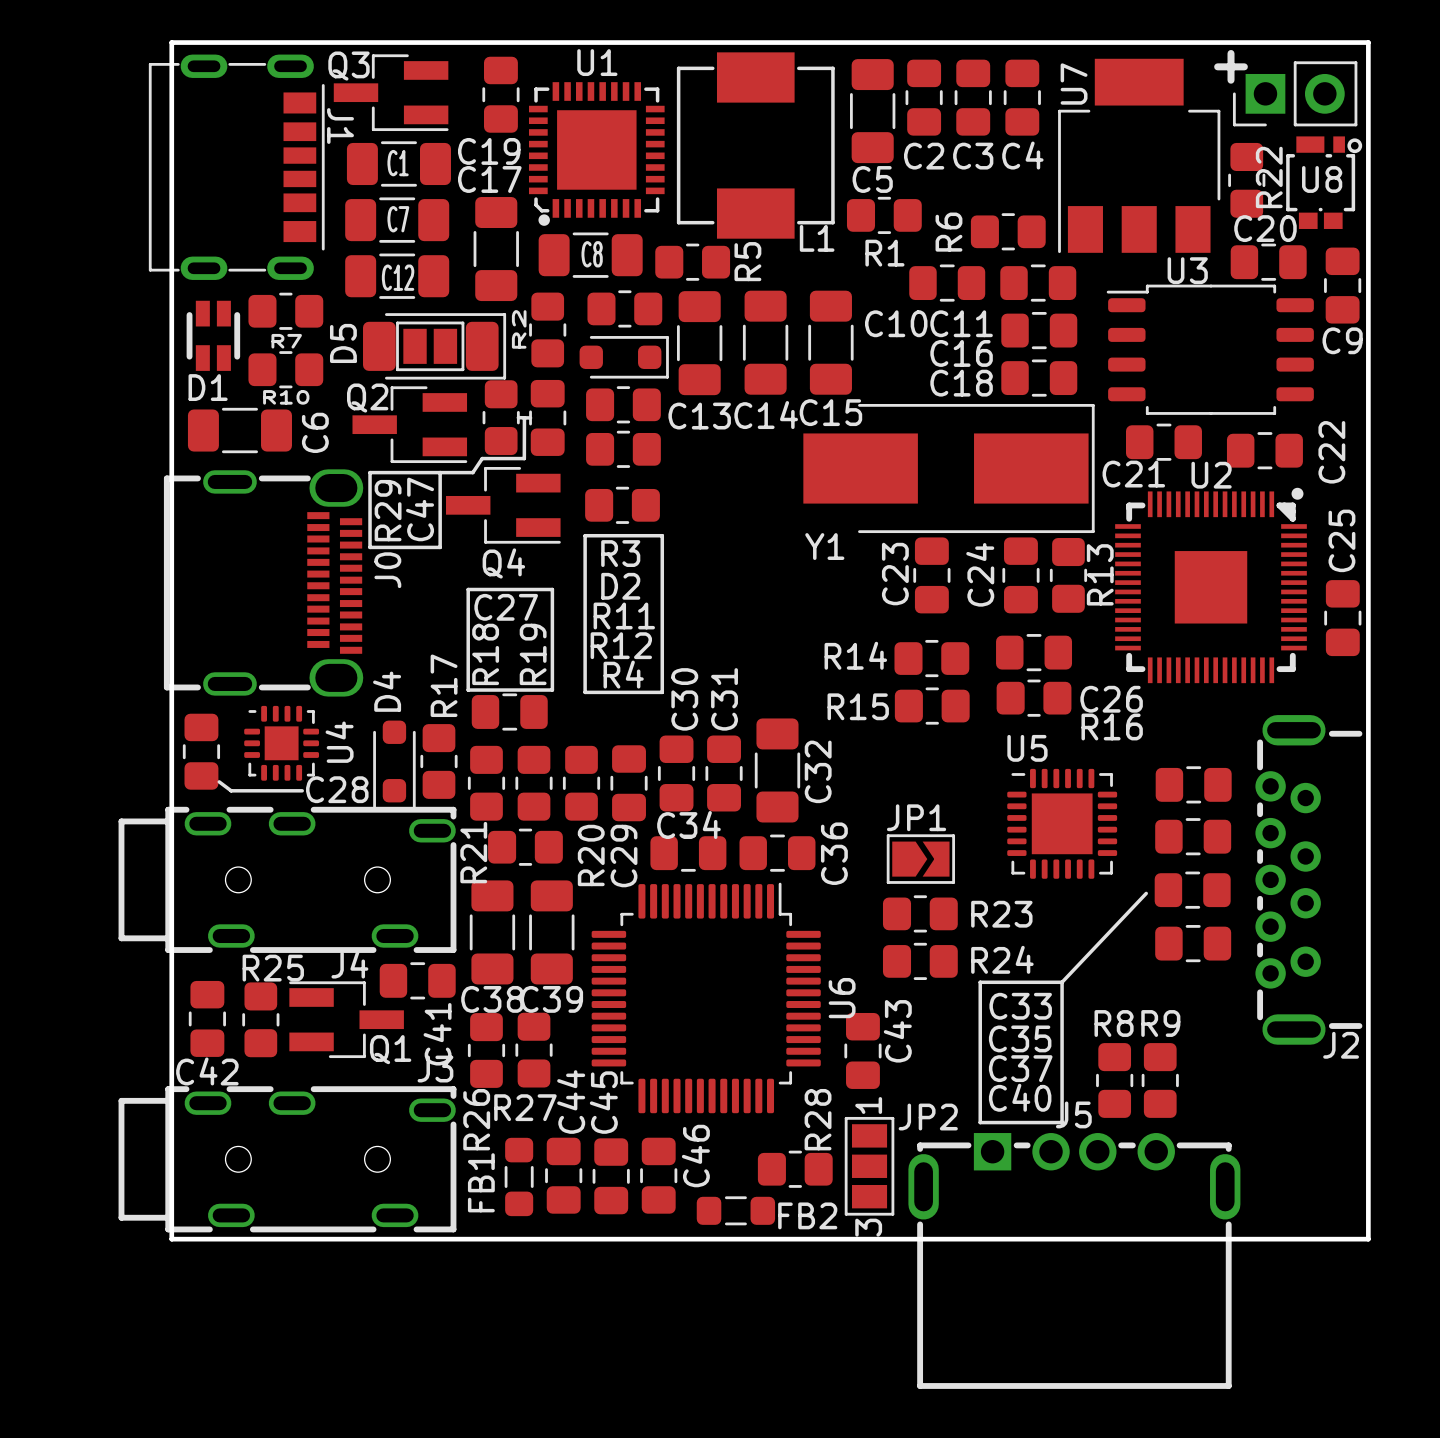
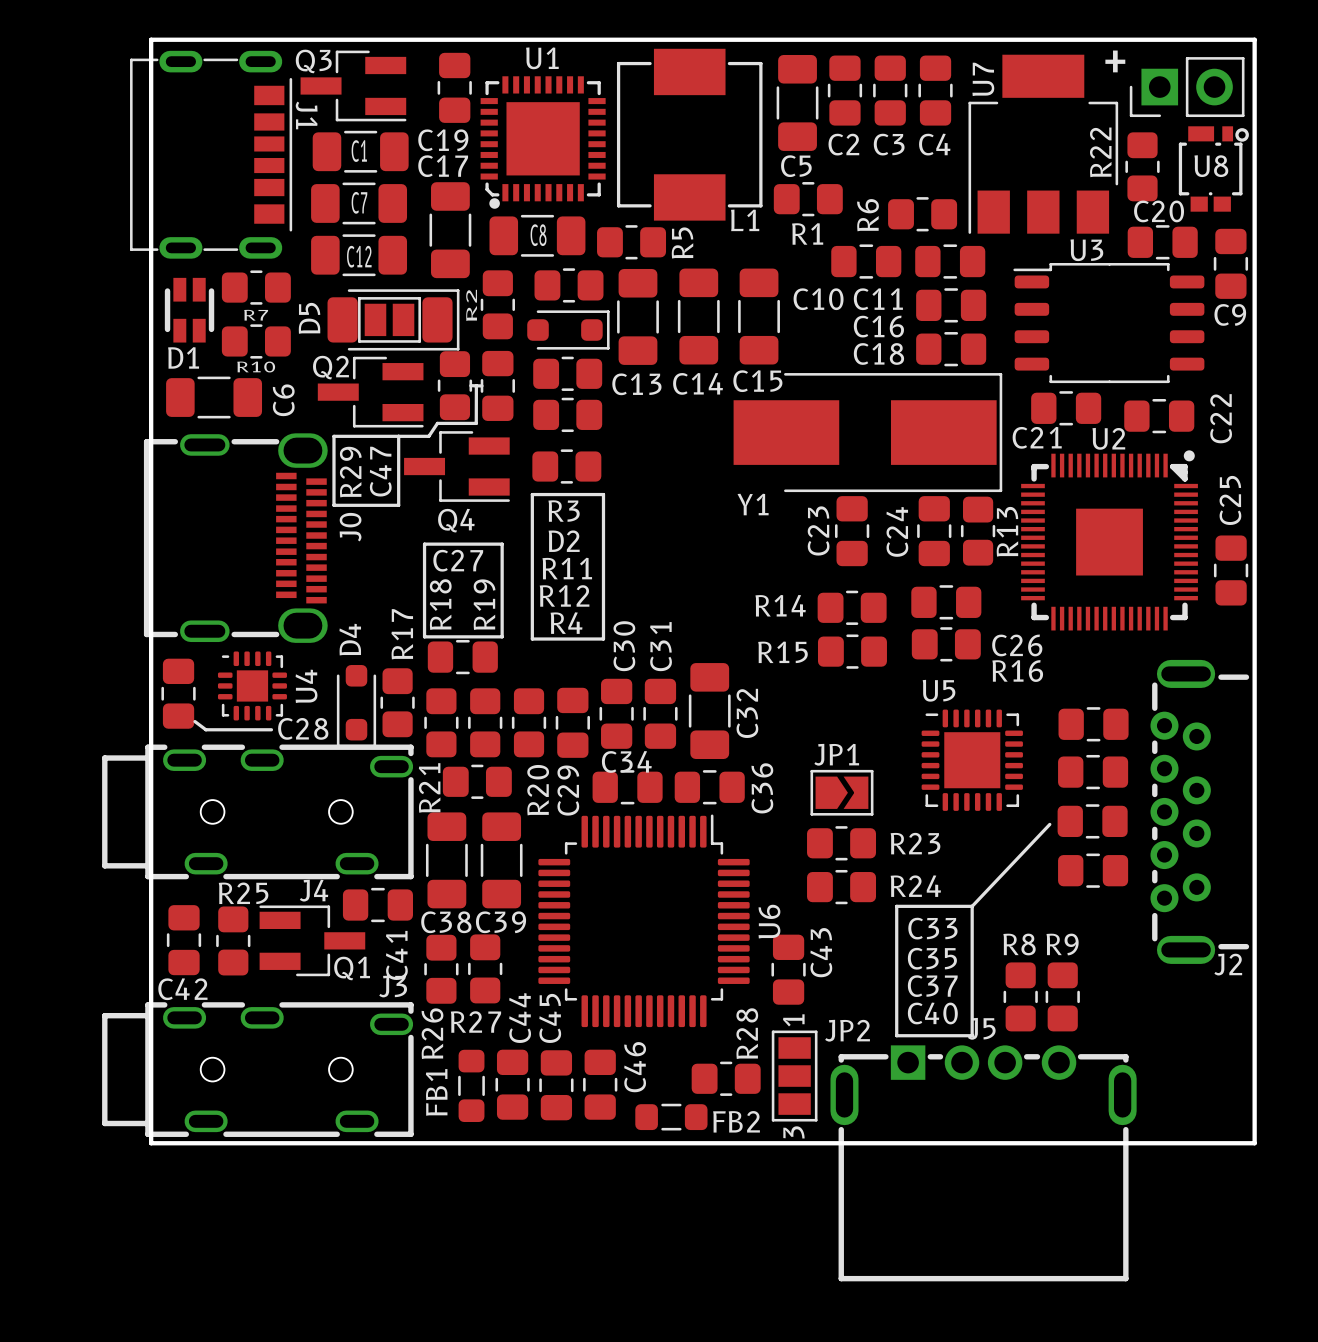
R22 name position: R22 (1269, 177) -> R22 (1100, 152)

